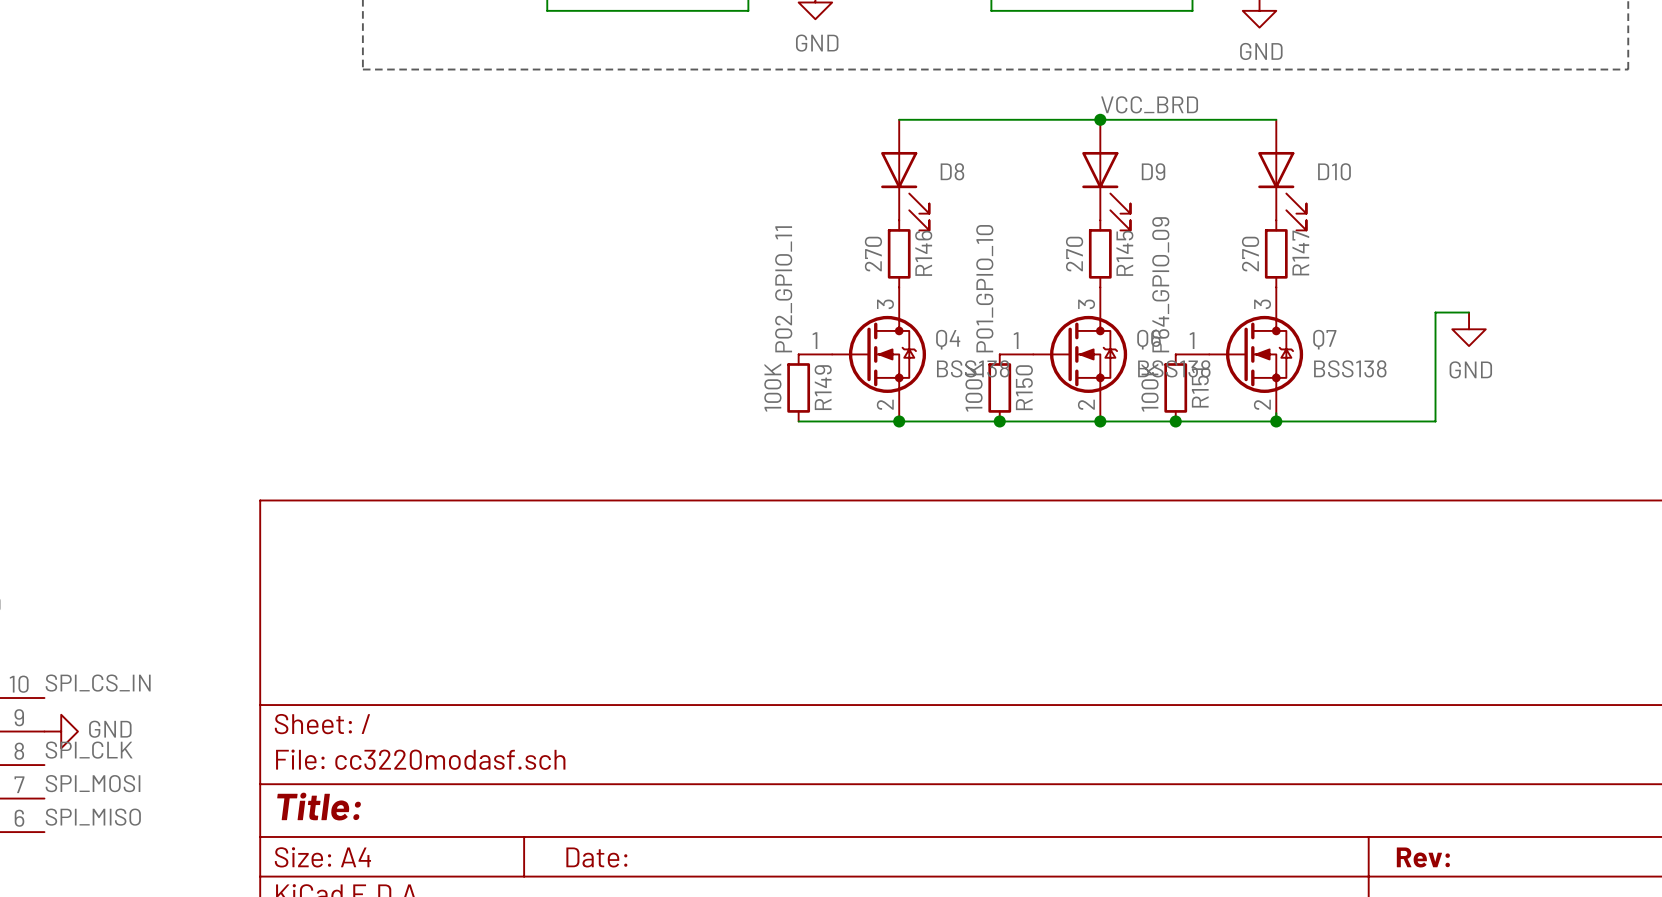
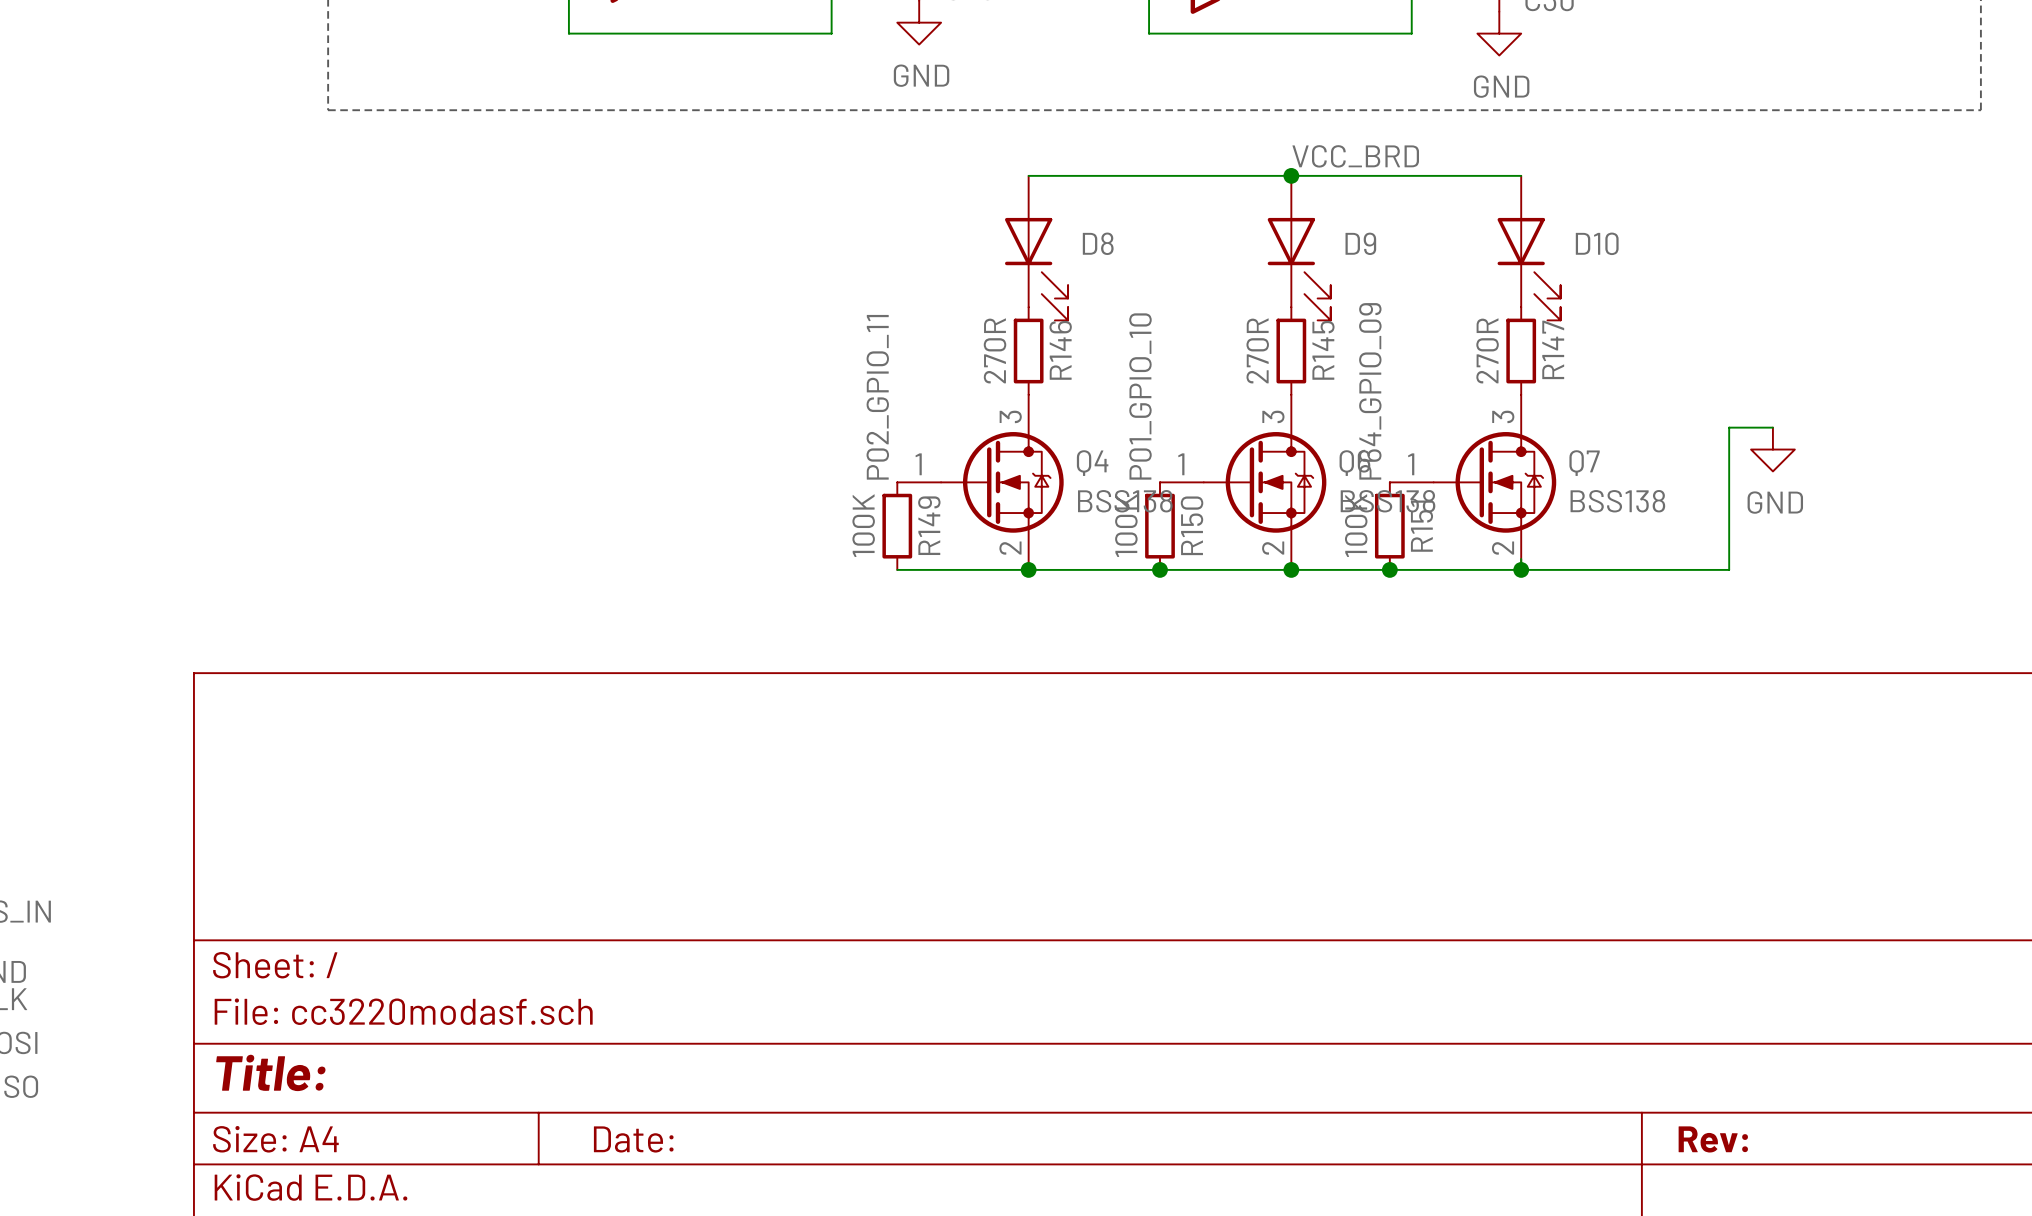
R146 value: 270 (873, 254) -> 270R (995, 350)
R145 value: 270 (1074, 254) -> 270R (1257, 350)
R147 value: 270 (1250, 254) -> 270R (1487, 350)

